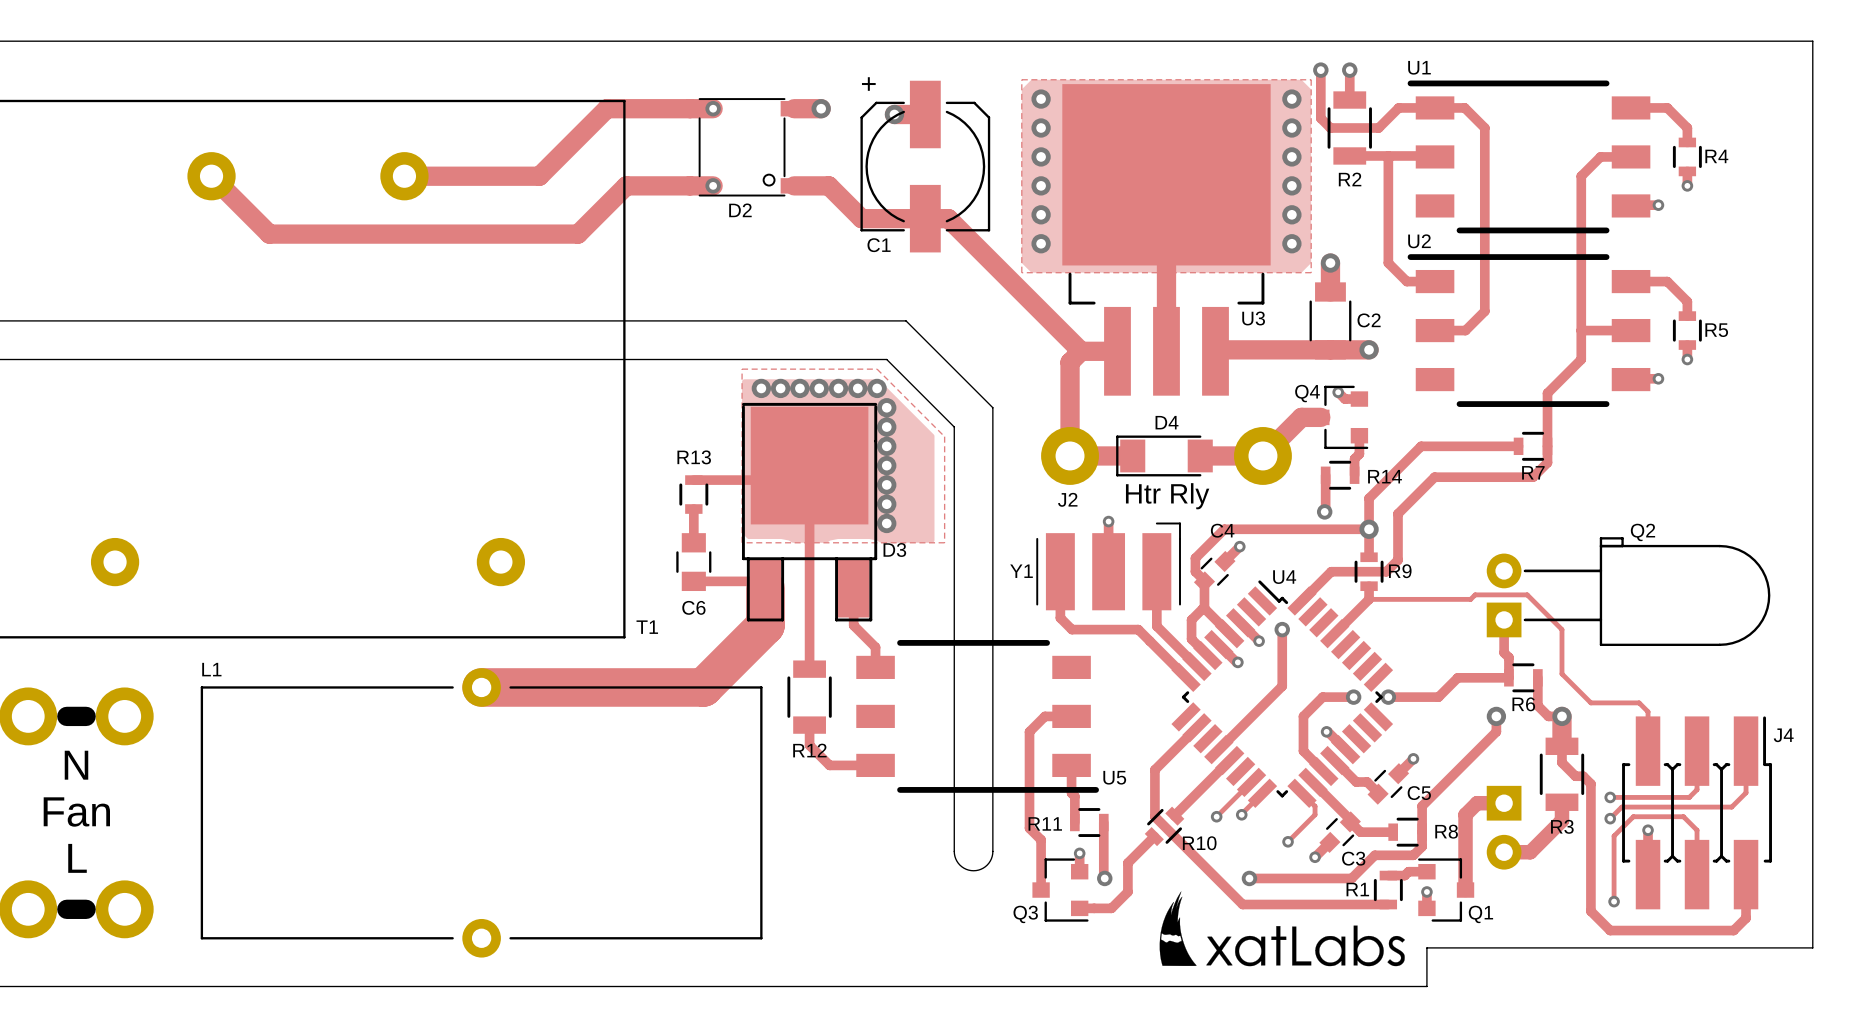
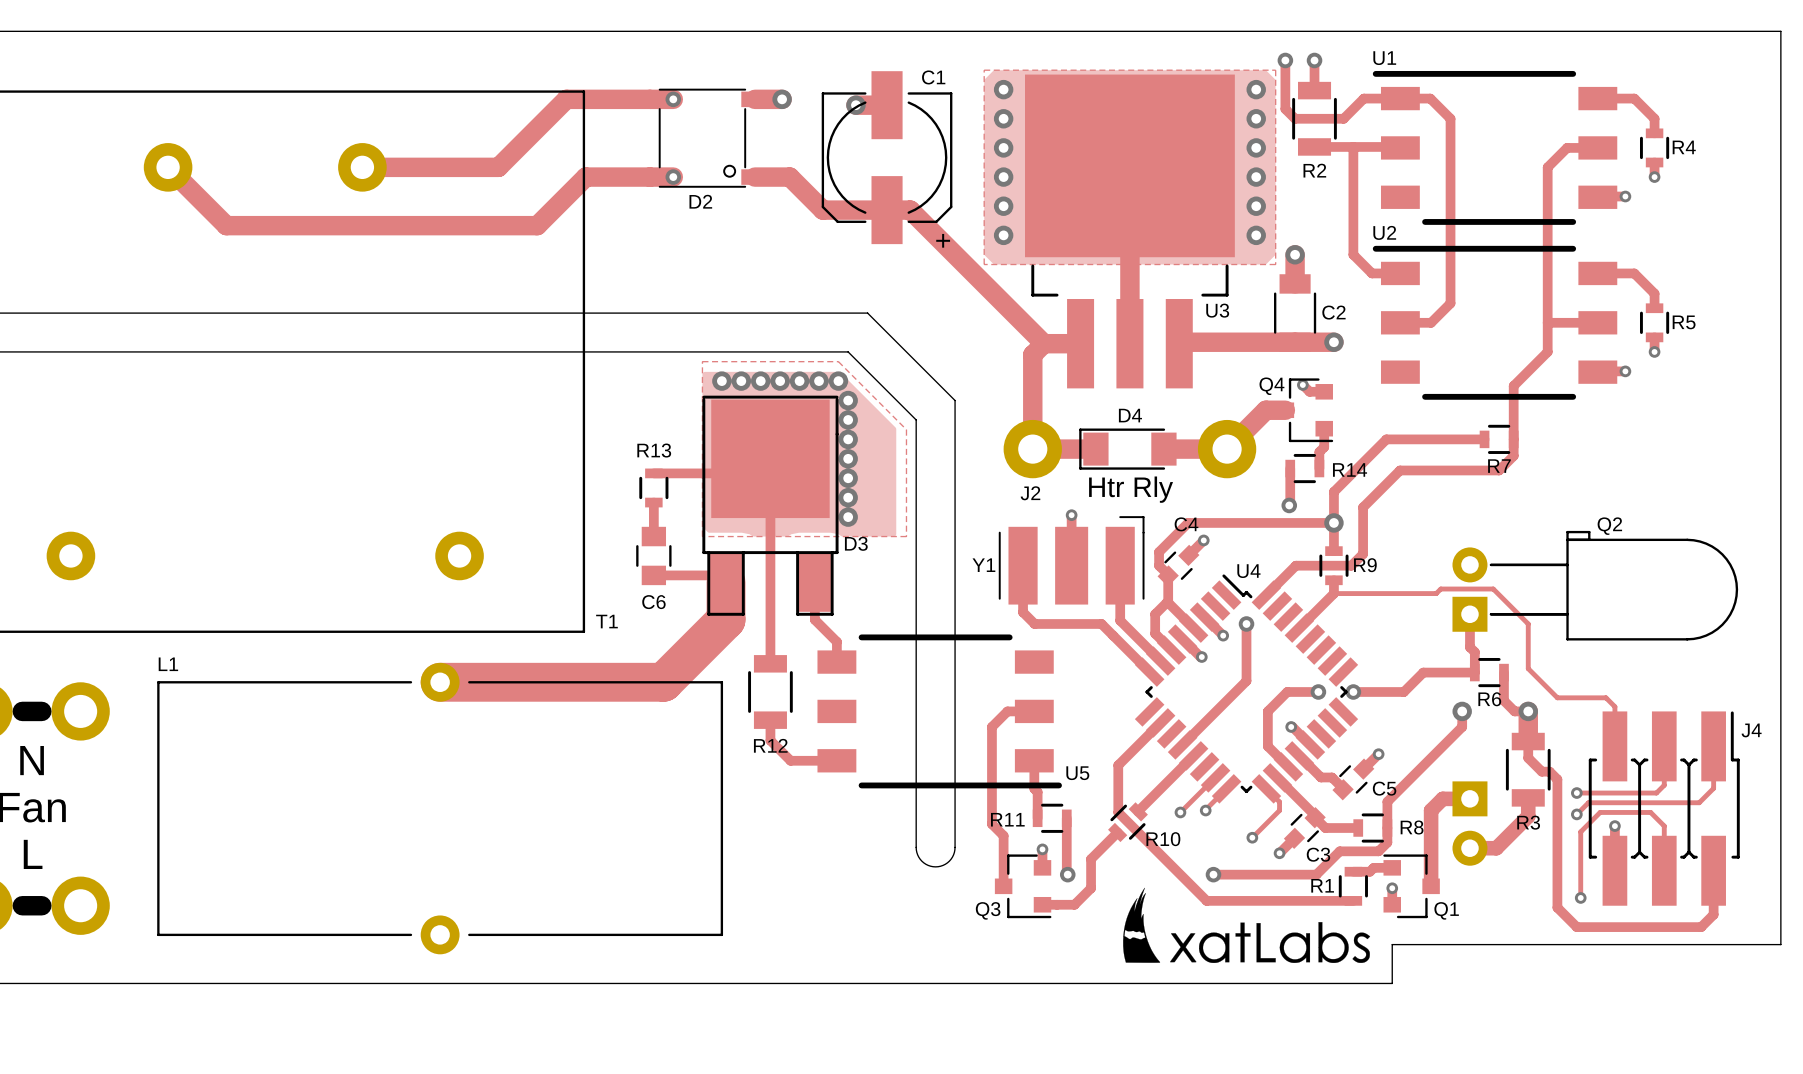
C1 rotation: 0° (925, 166) -> 180° (887, 157)

